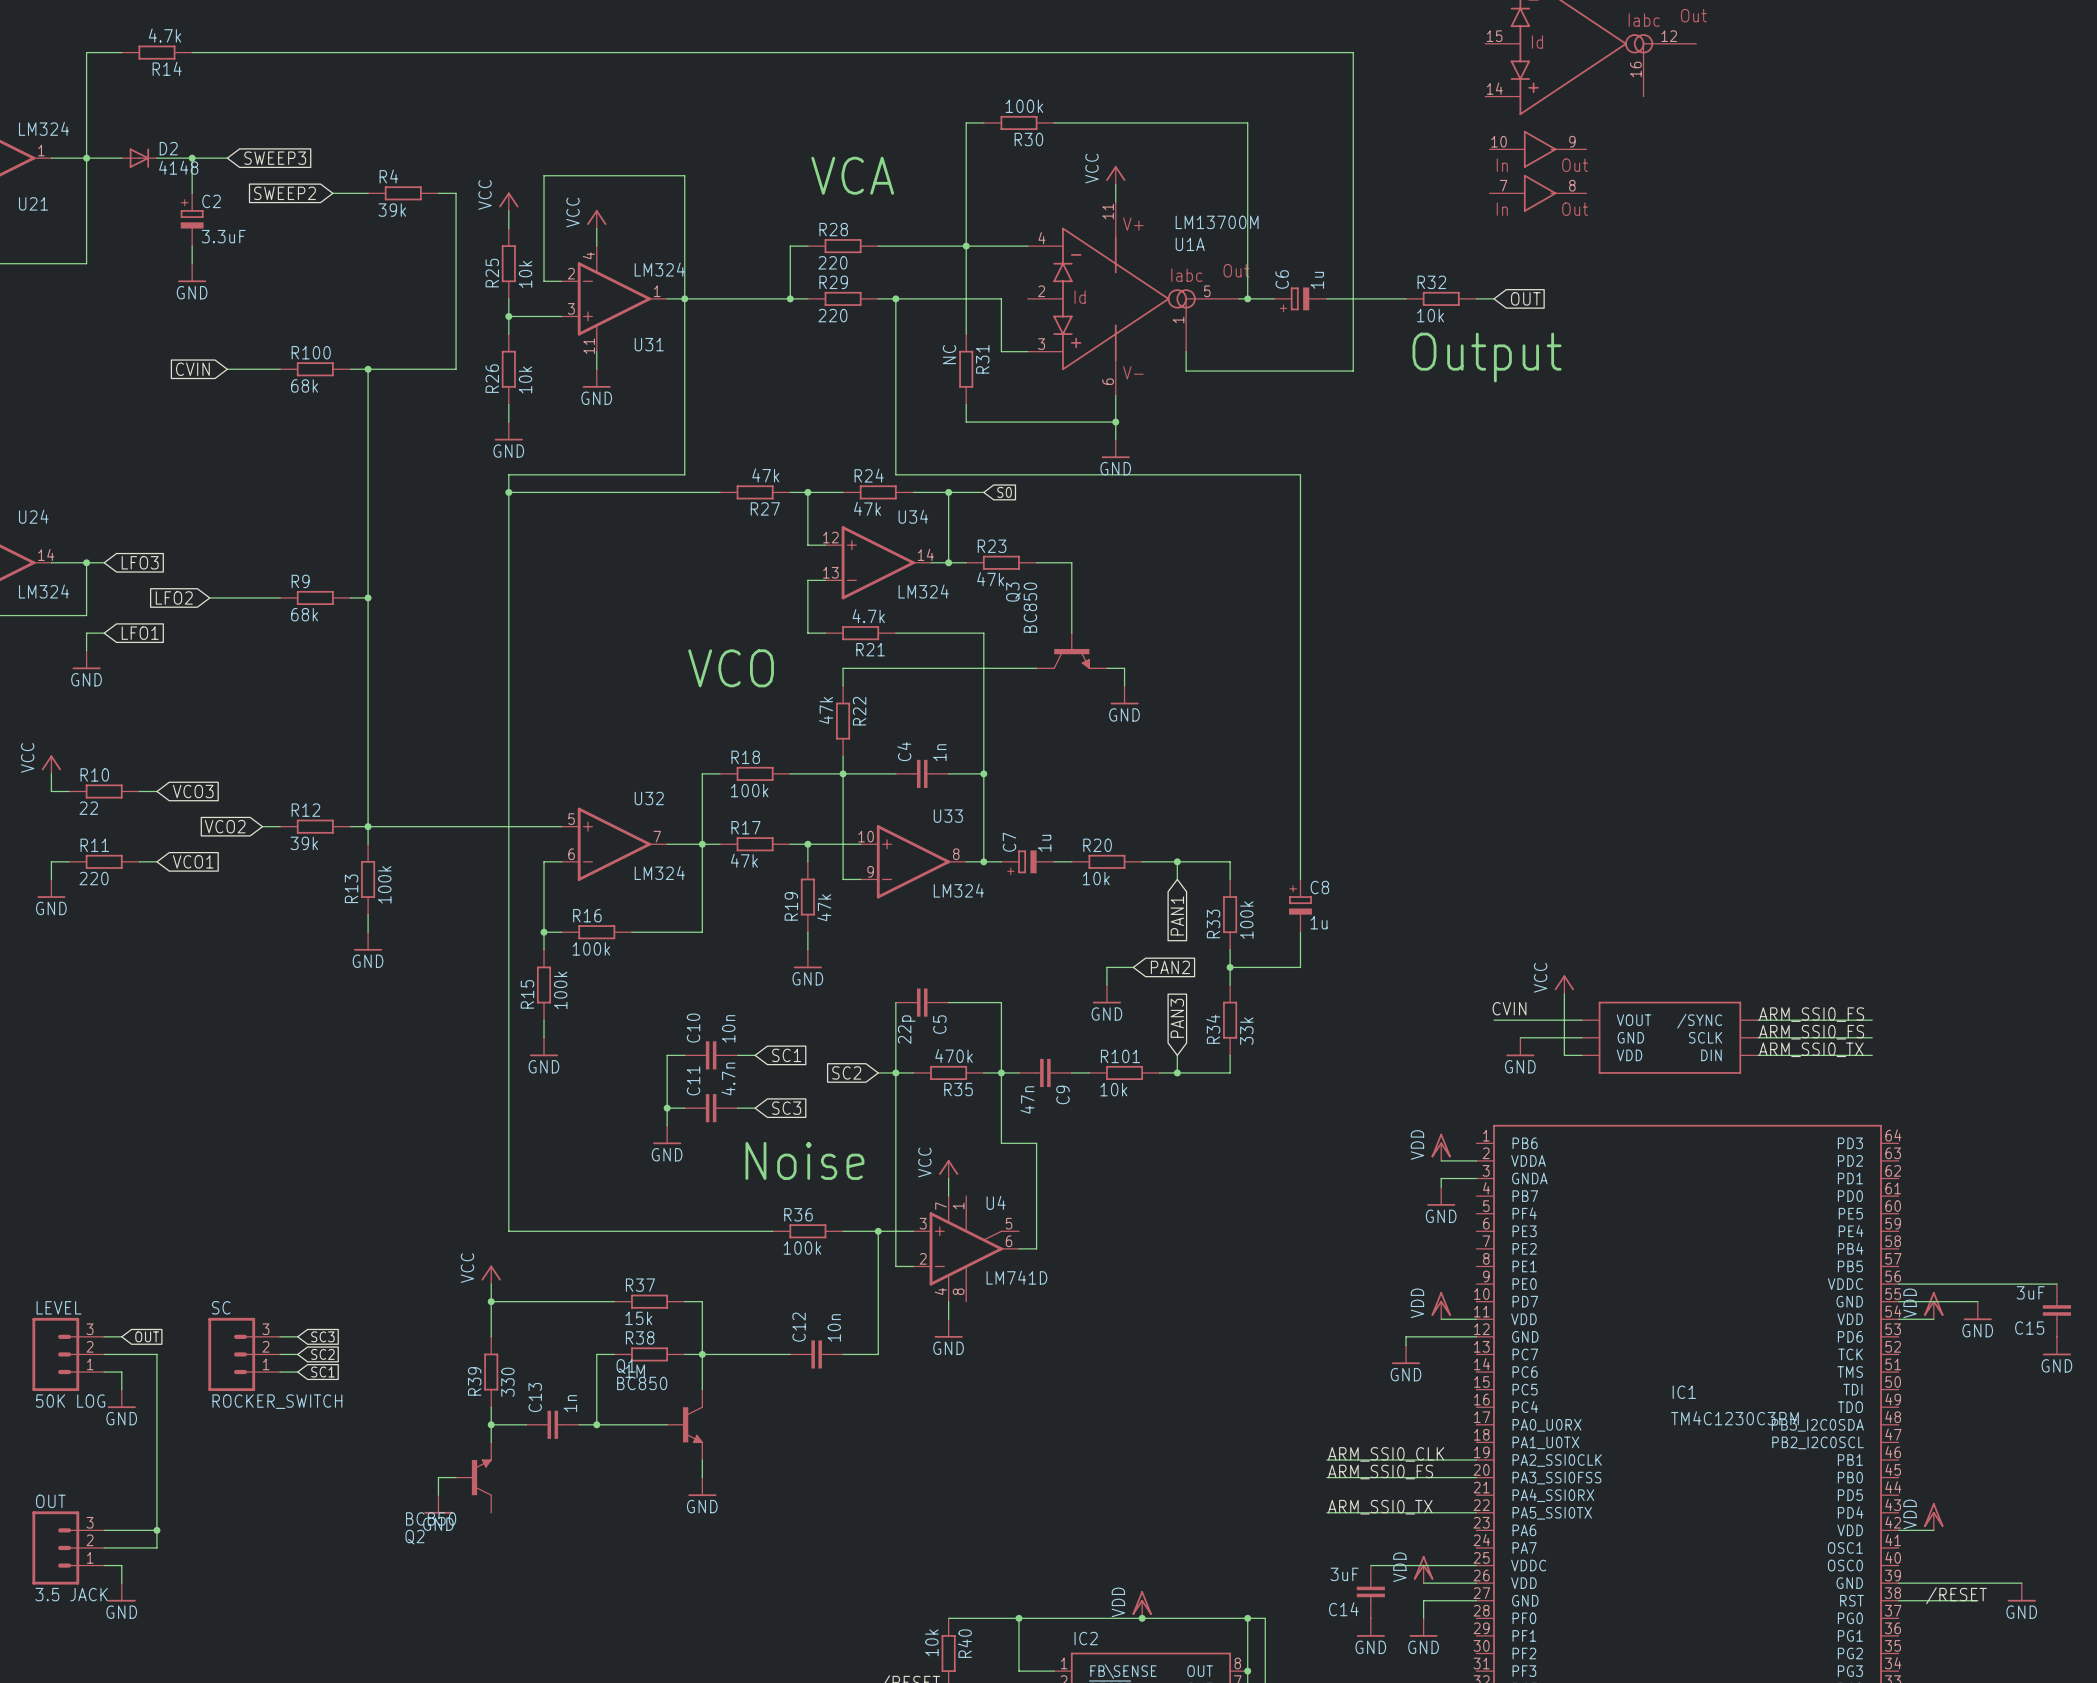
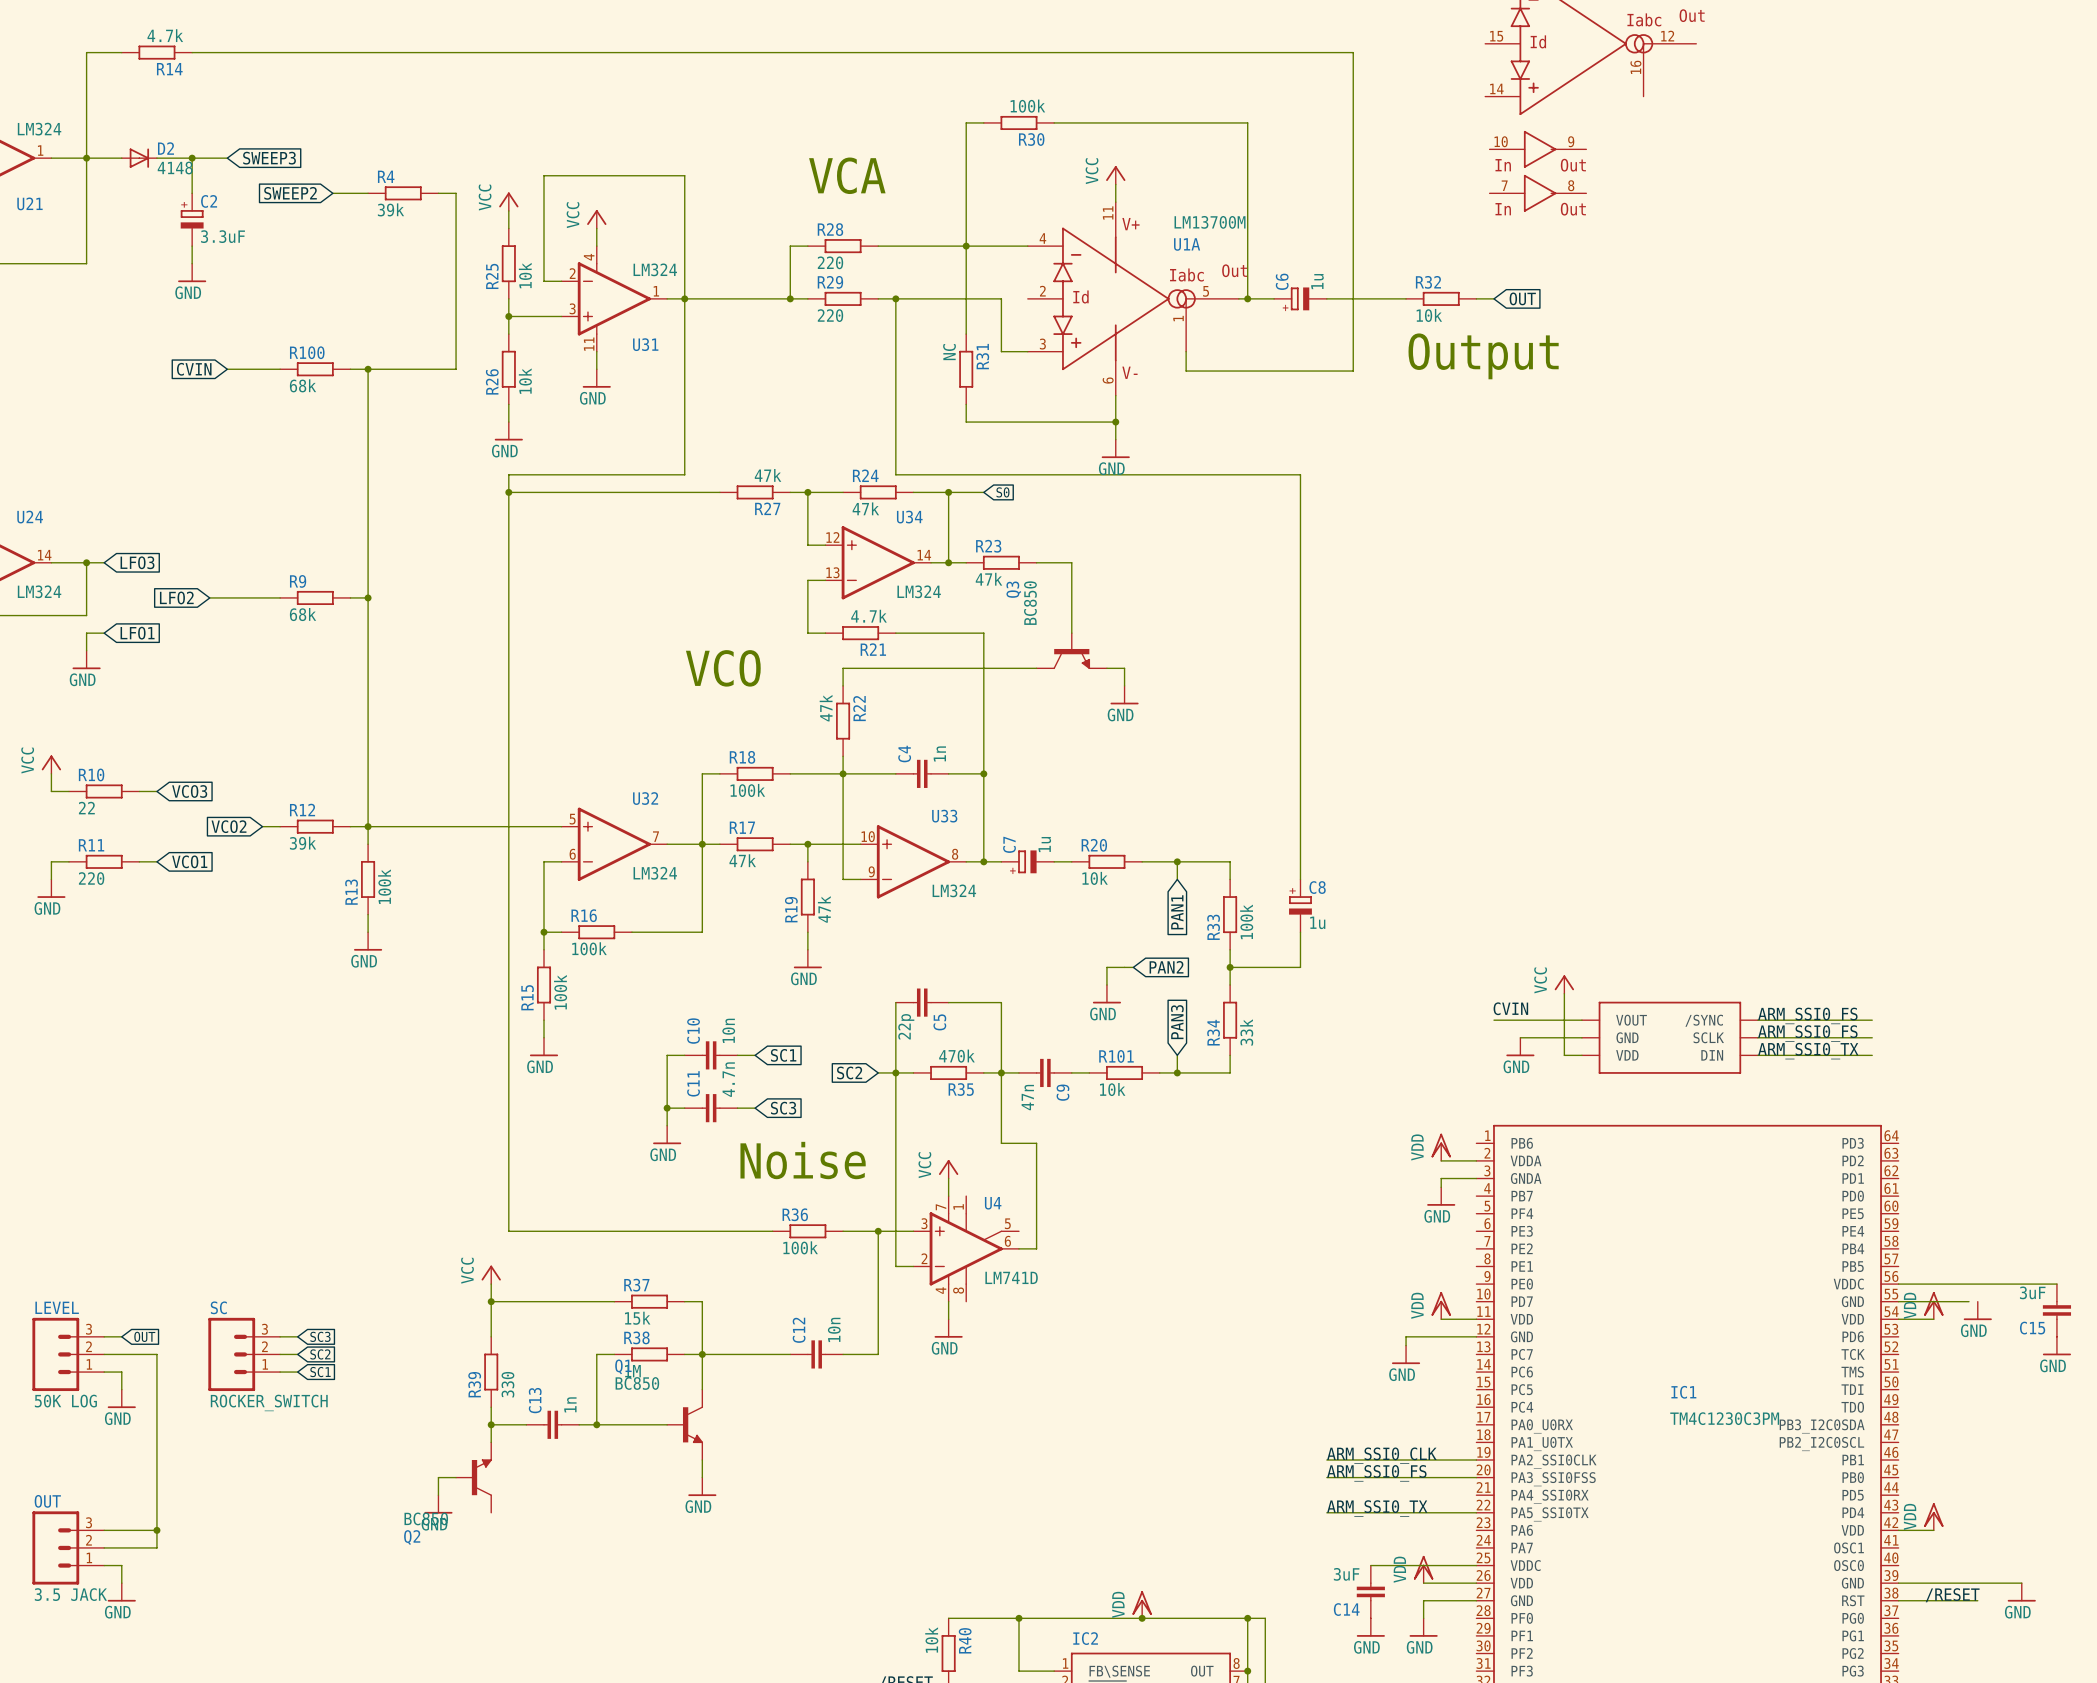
wire: (1968, 1301) (1977, 1301) -> none

